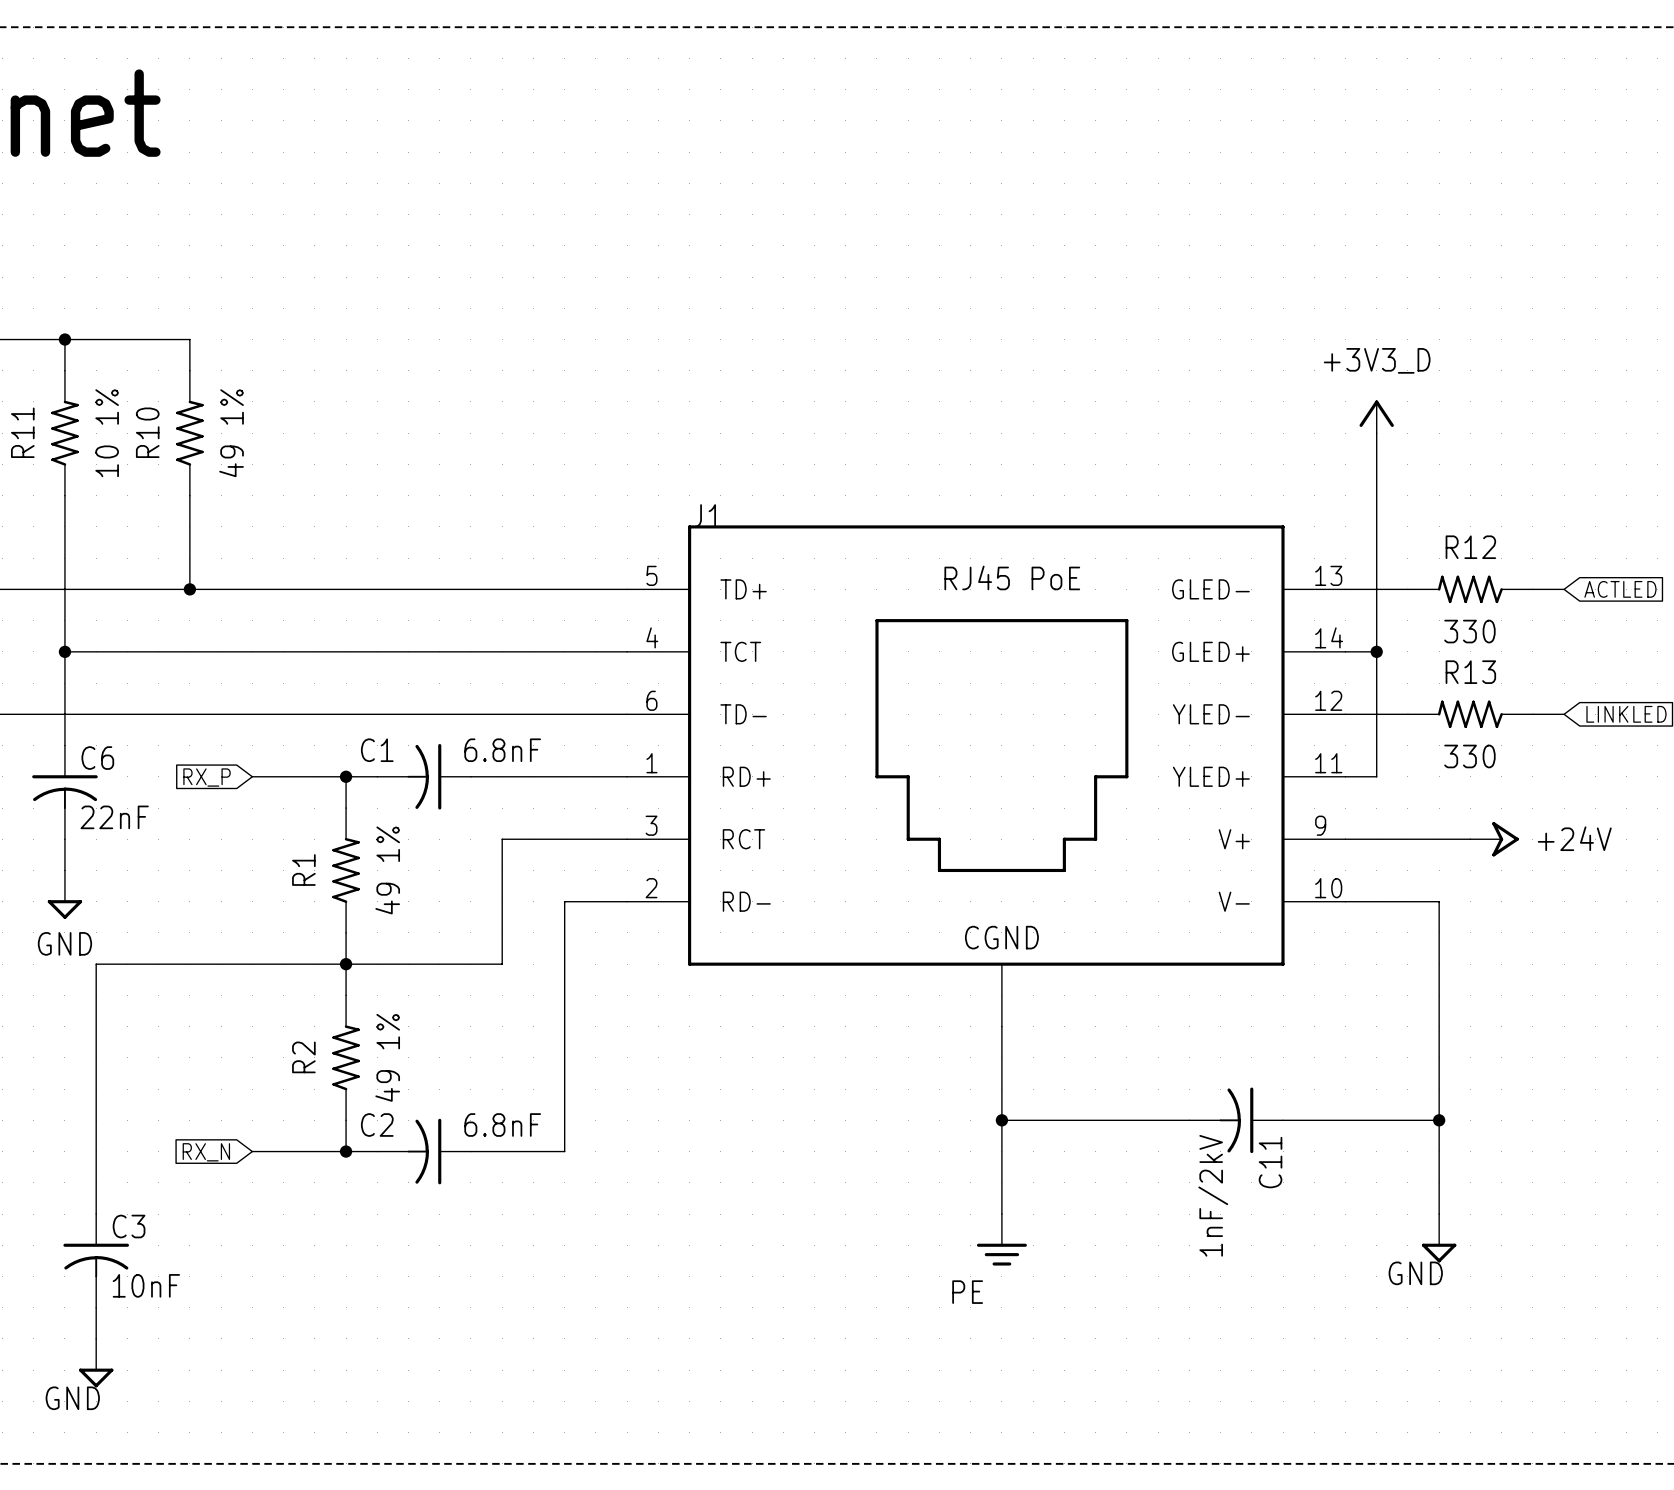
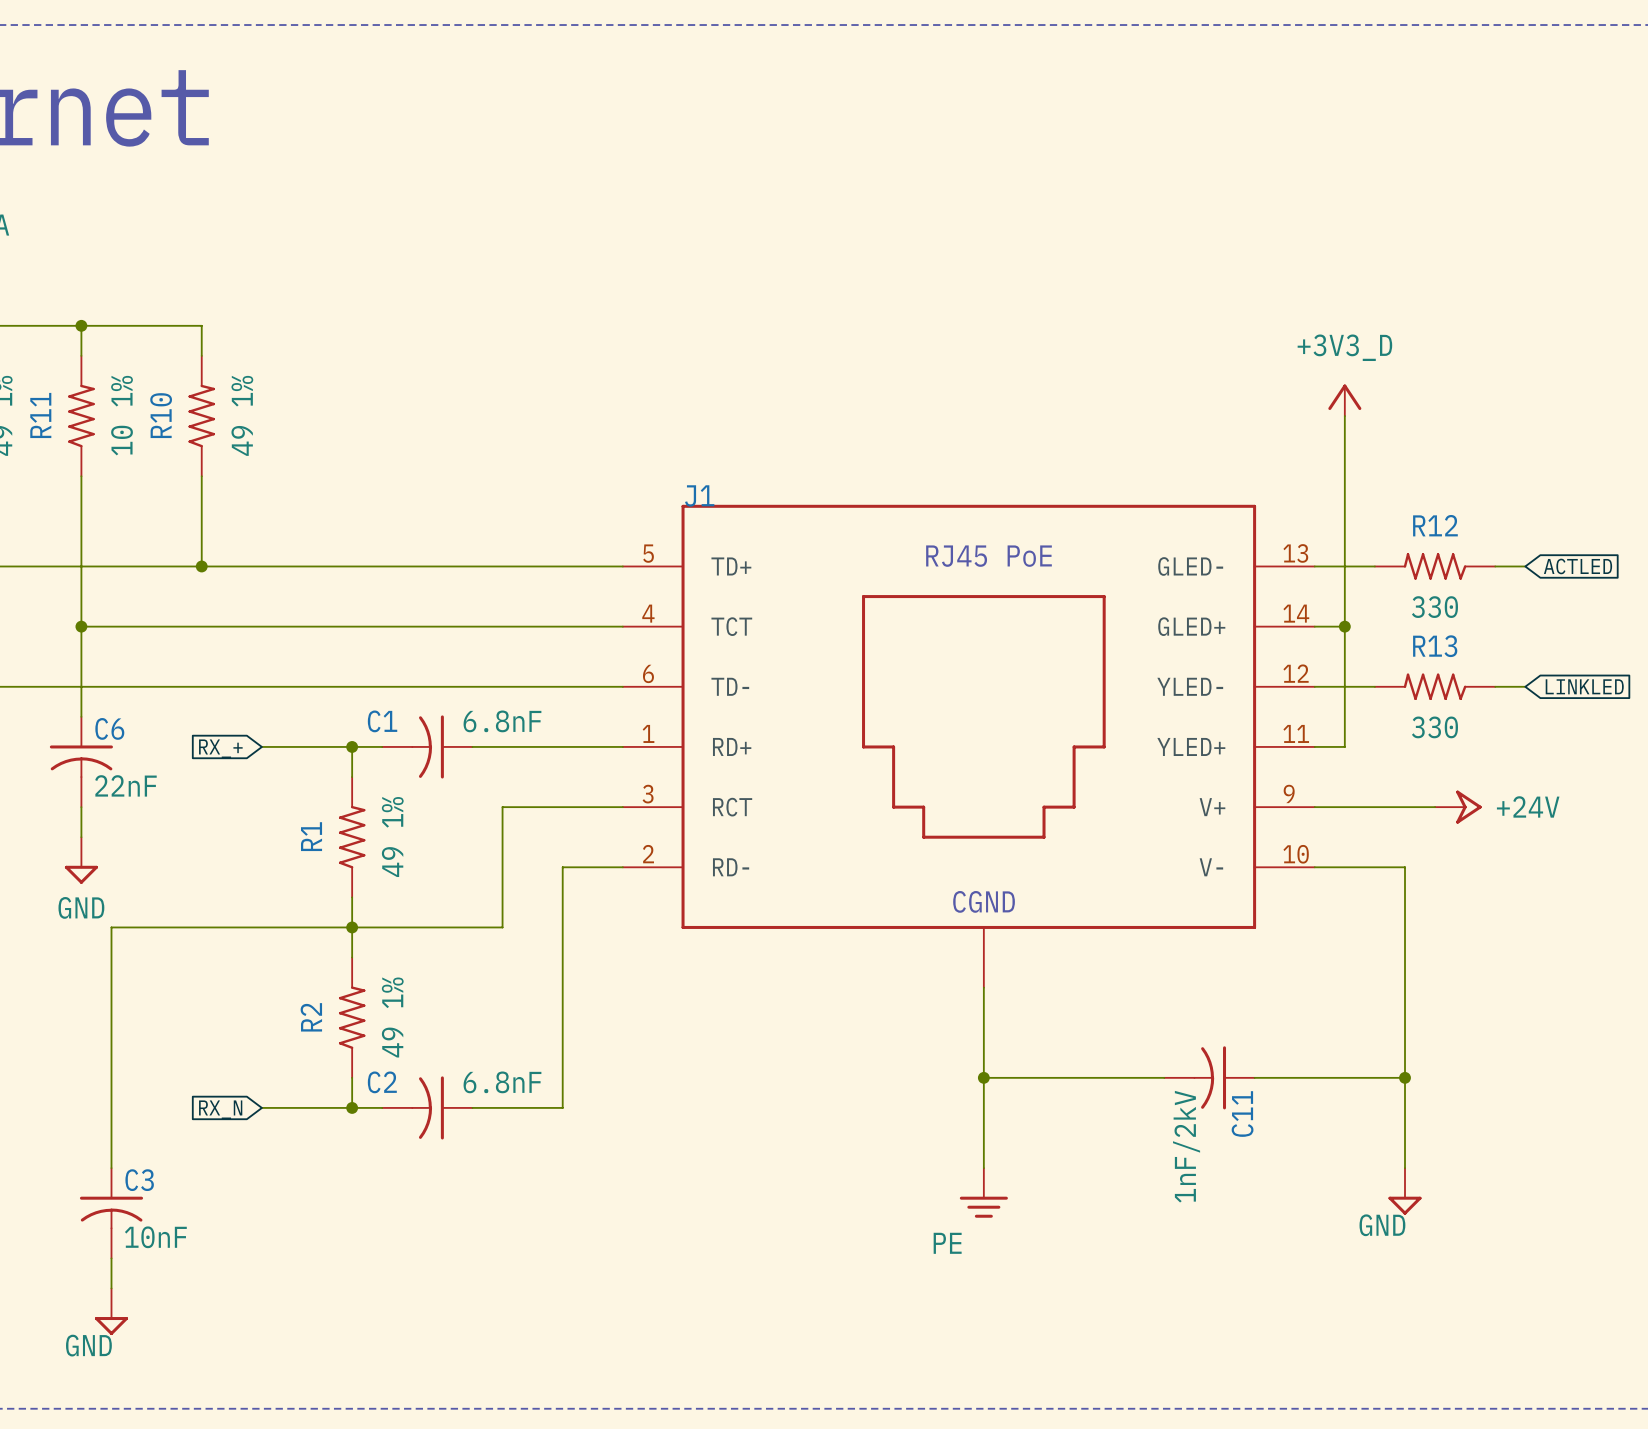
global label: RX_P (207, 777) -> RX_+ (220, 748)

